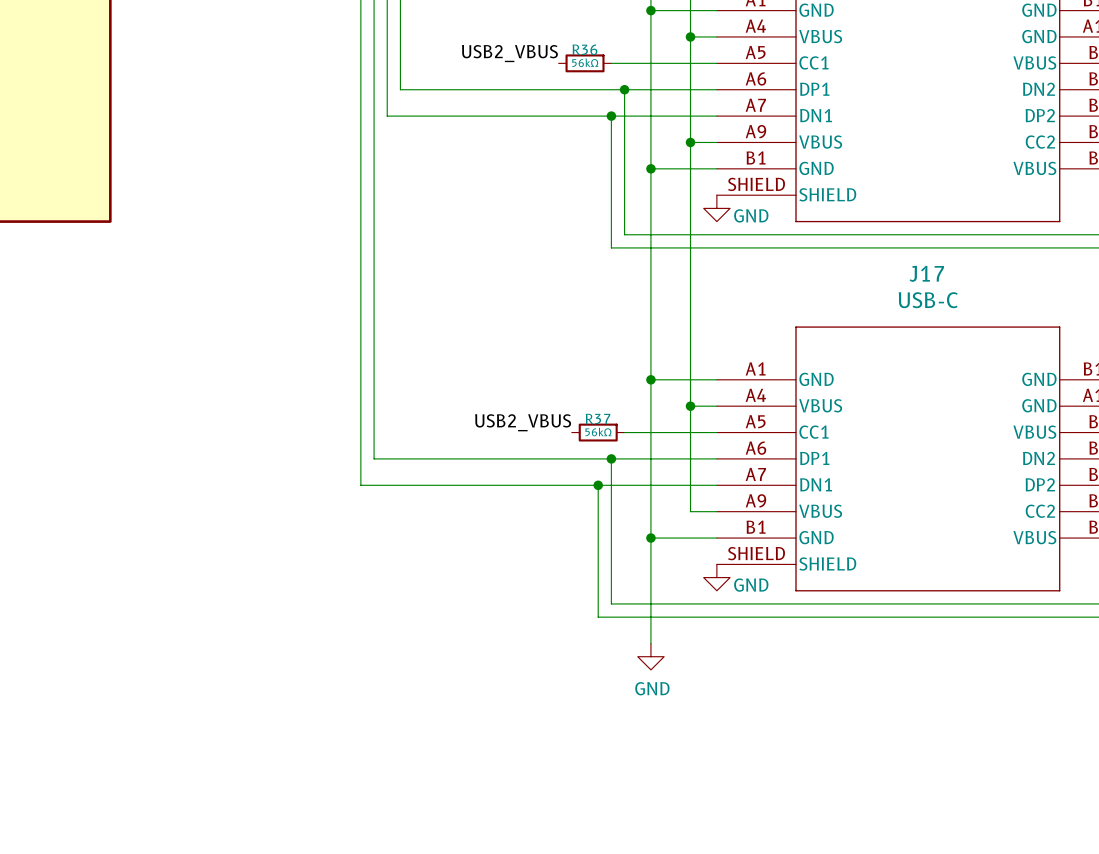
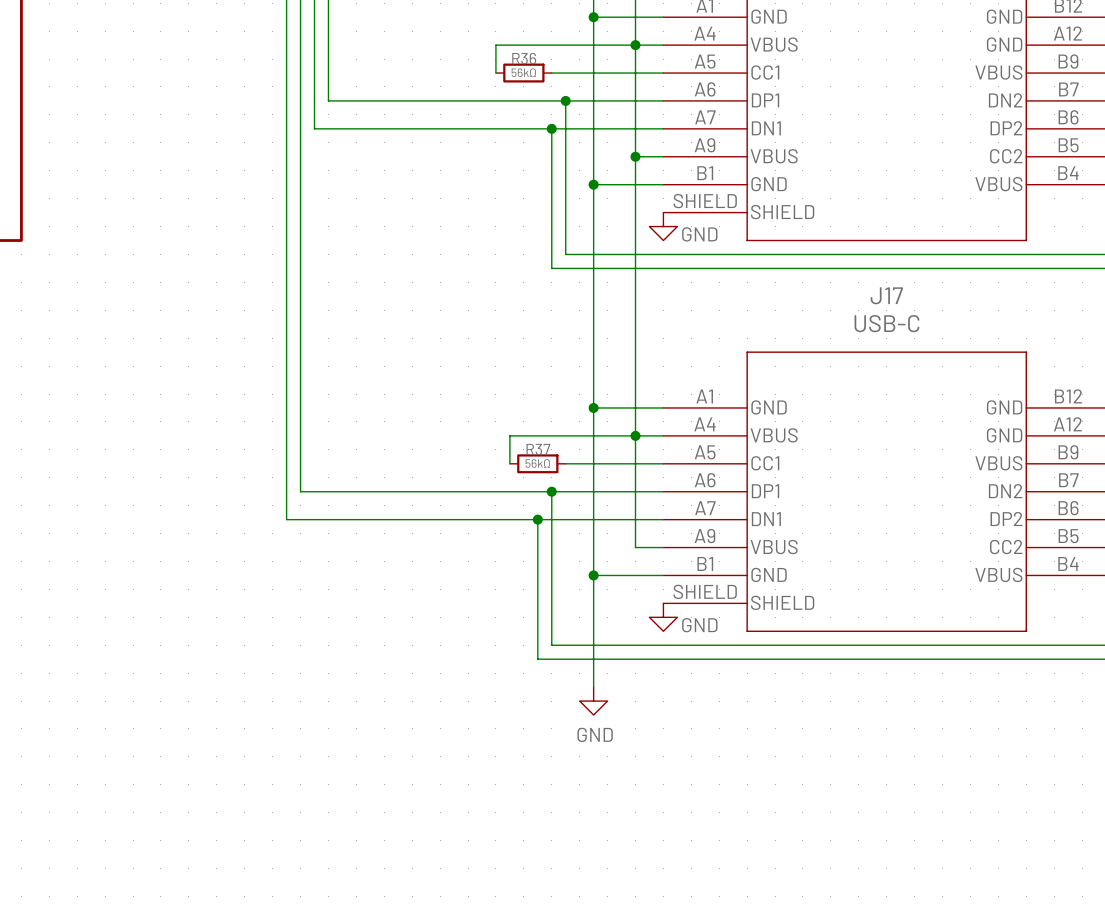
wire: none -> (635, 45) (495, 45) (495, 73)
label: USB2_VBUS (509, 53) -> none
wire: none -> (635, 435) (509, 435) (509, 463)
label: USB2_VBUS (523, 422) -> none

